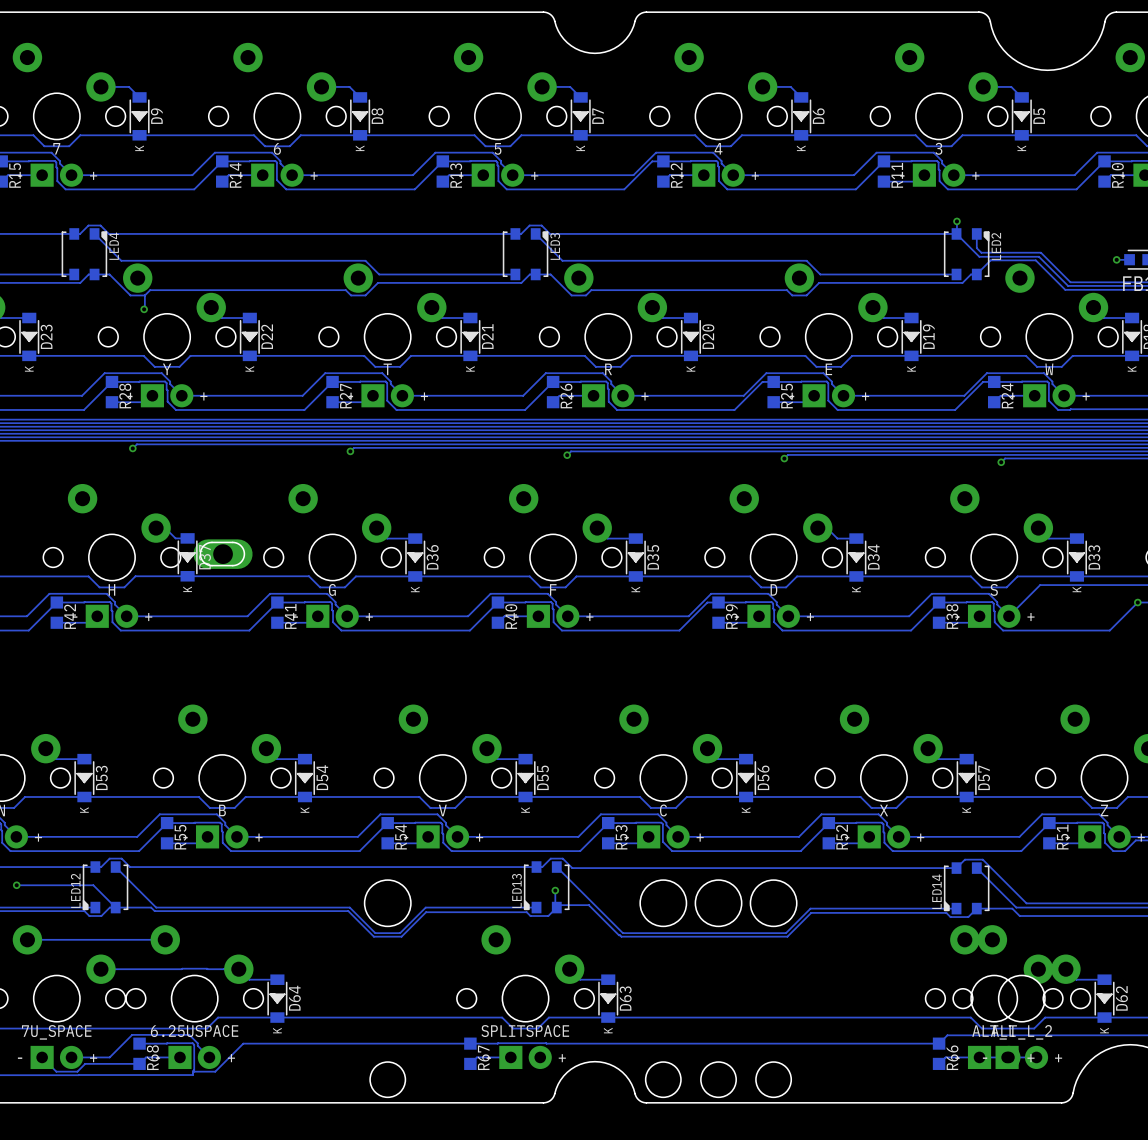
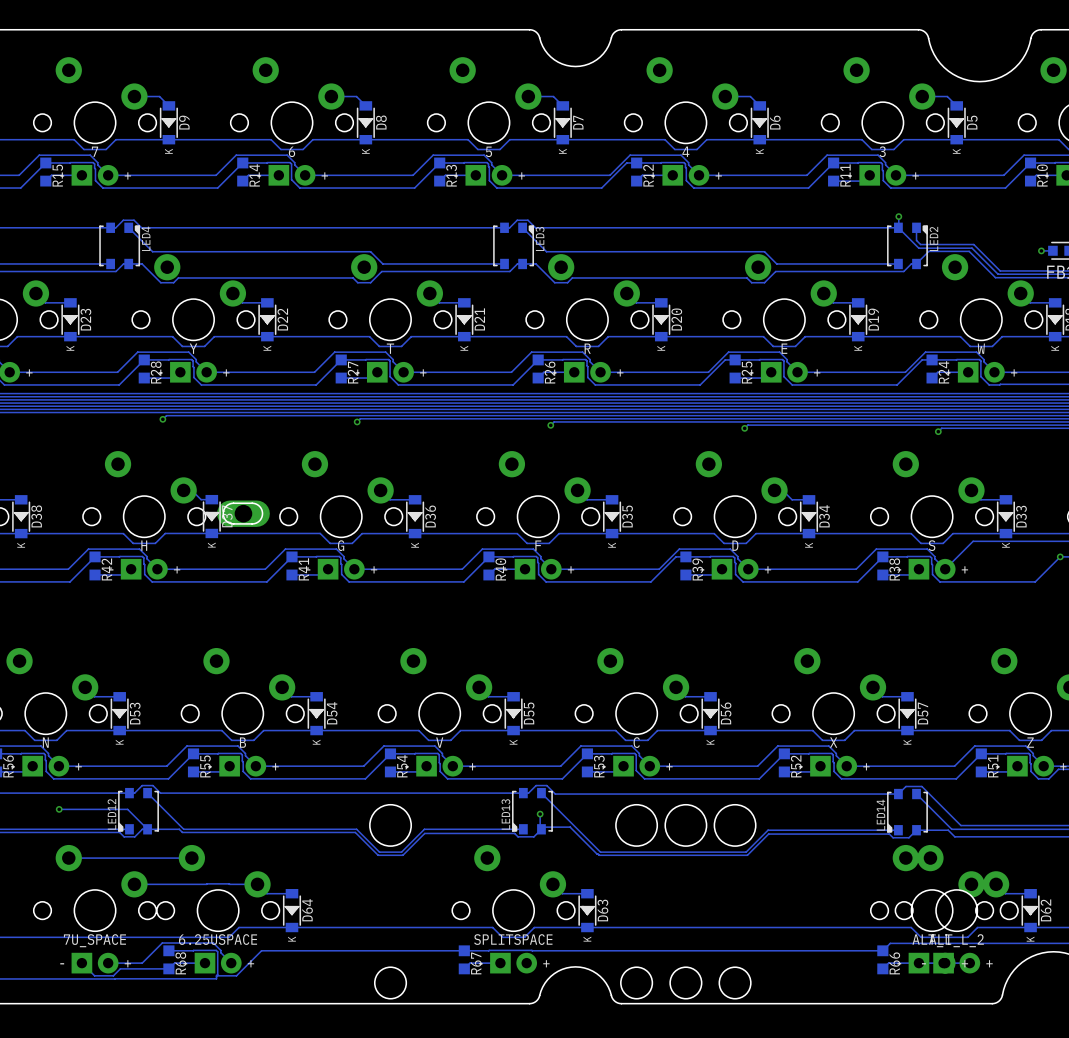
track: (144, 295) (144, 309) -> none
via: (144, 309) -> none

